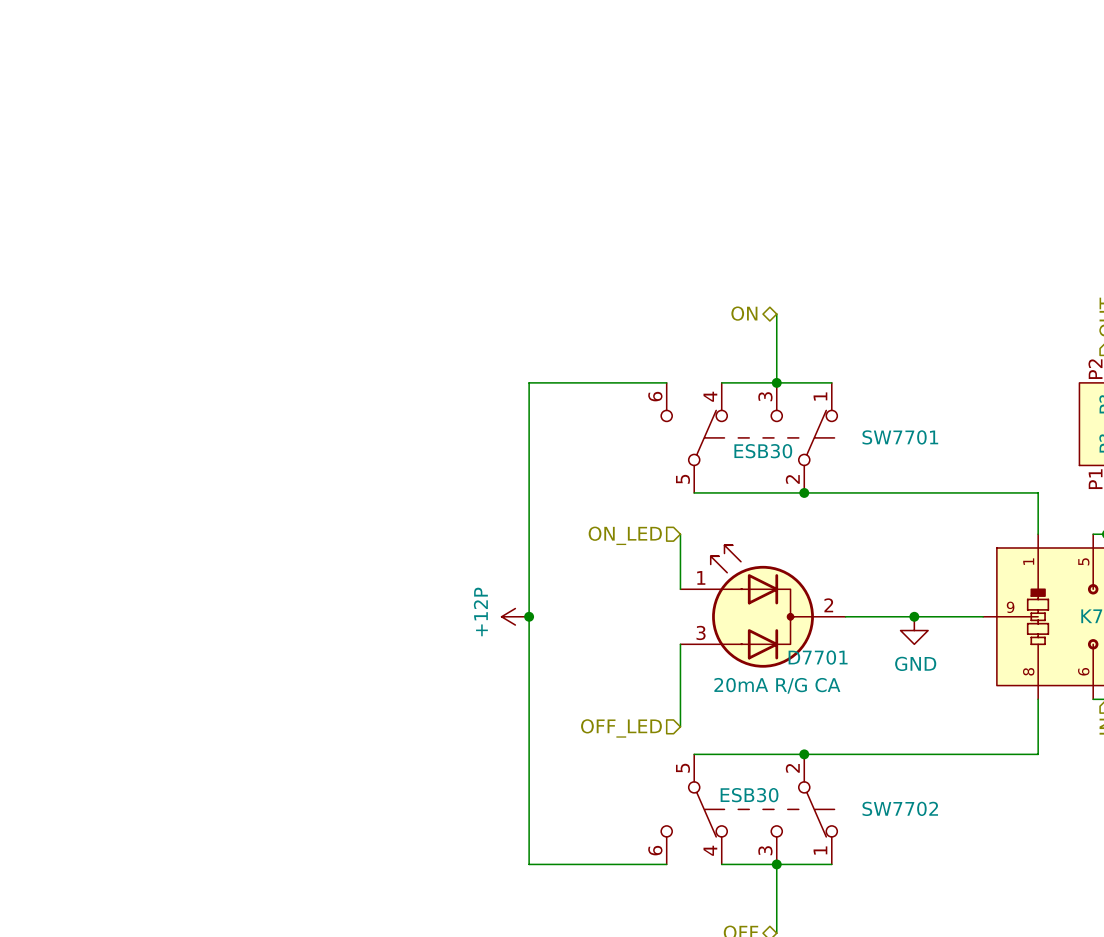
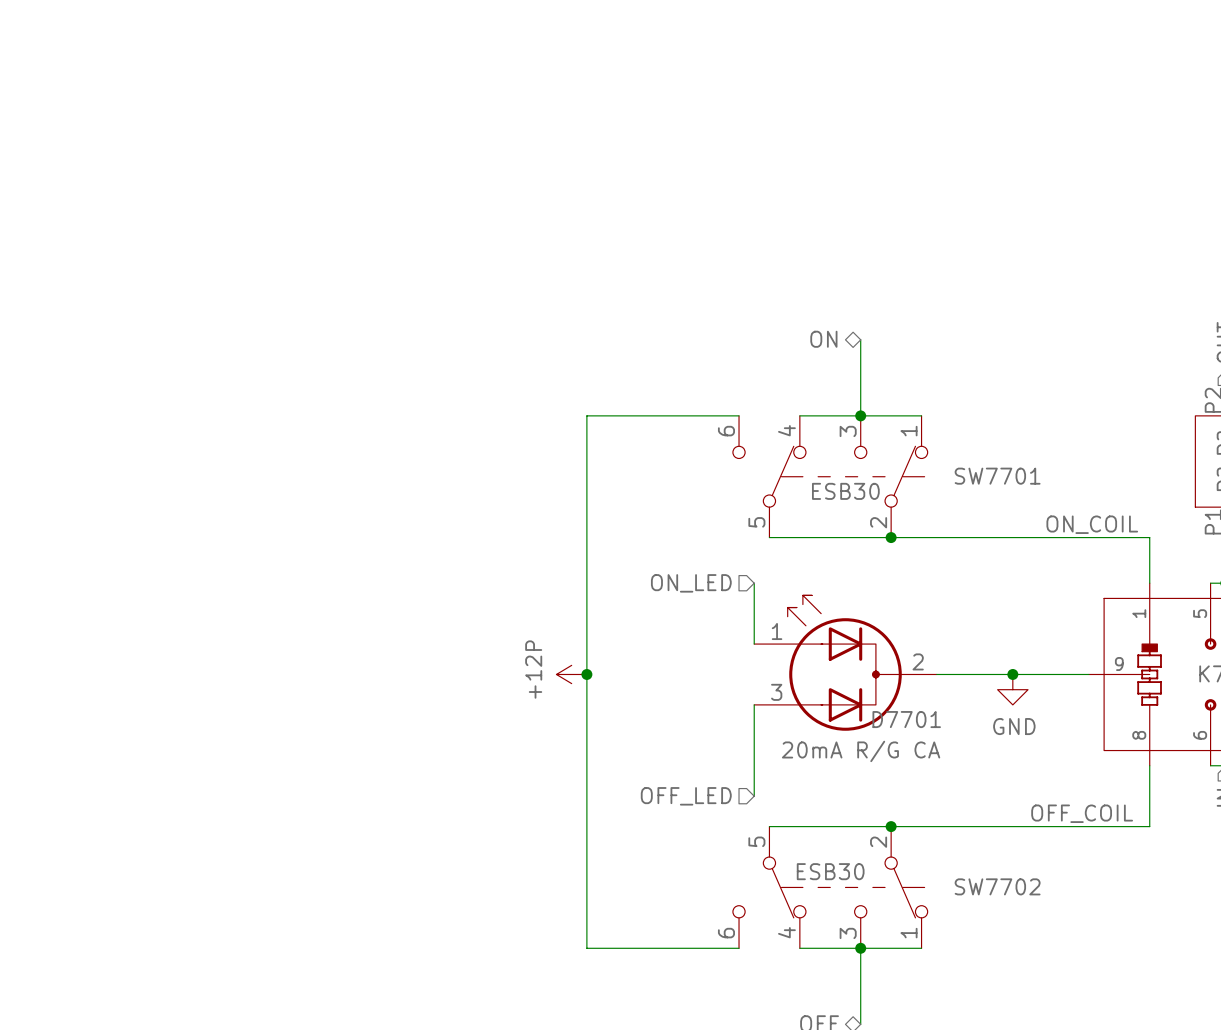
label: none -> ON_COIL (1092, 524)
label: none -> OFF_COIL (1082, 813)

